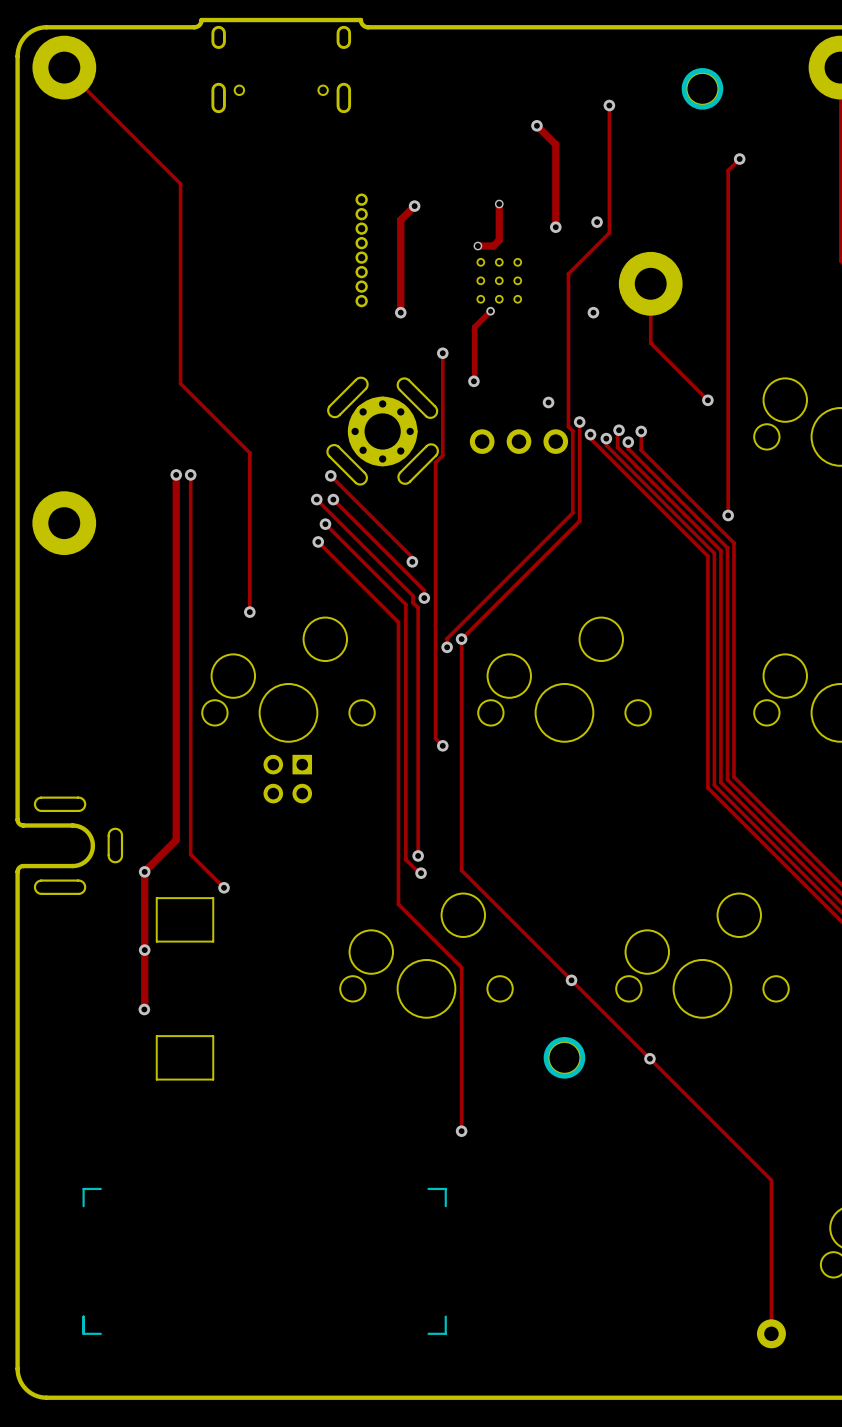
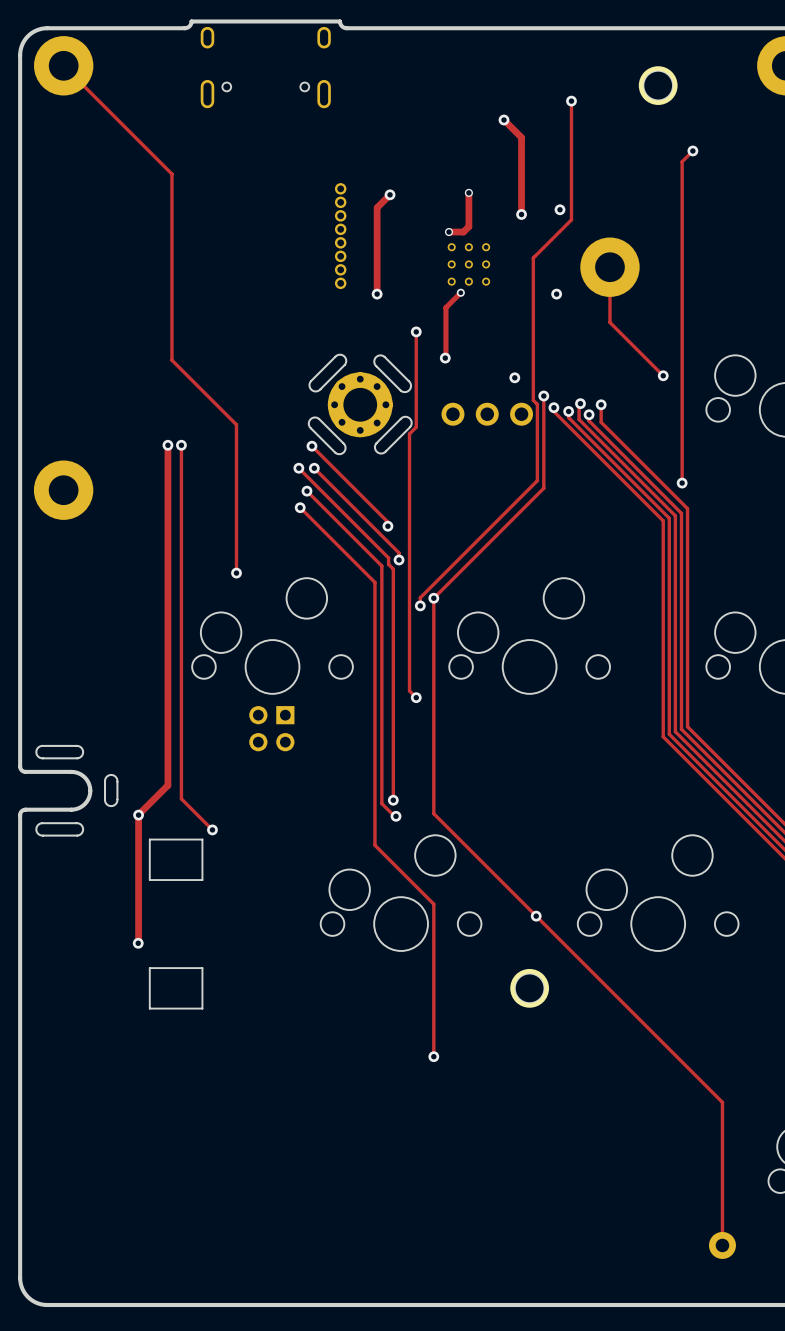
via: (144, 950) -> none
via: (649, 1058) -> none
line: (100, 1188) (83, 1188) (83, 1206) -> none
line: (428, 1188) (445, 1188) (445, 1206) -> none
line: (83, 1316) (83, 1333) (100, 1333) -> none
line: (445, 1316) (445, 1333) (428, 1333) -> none

